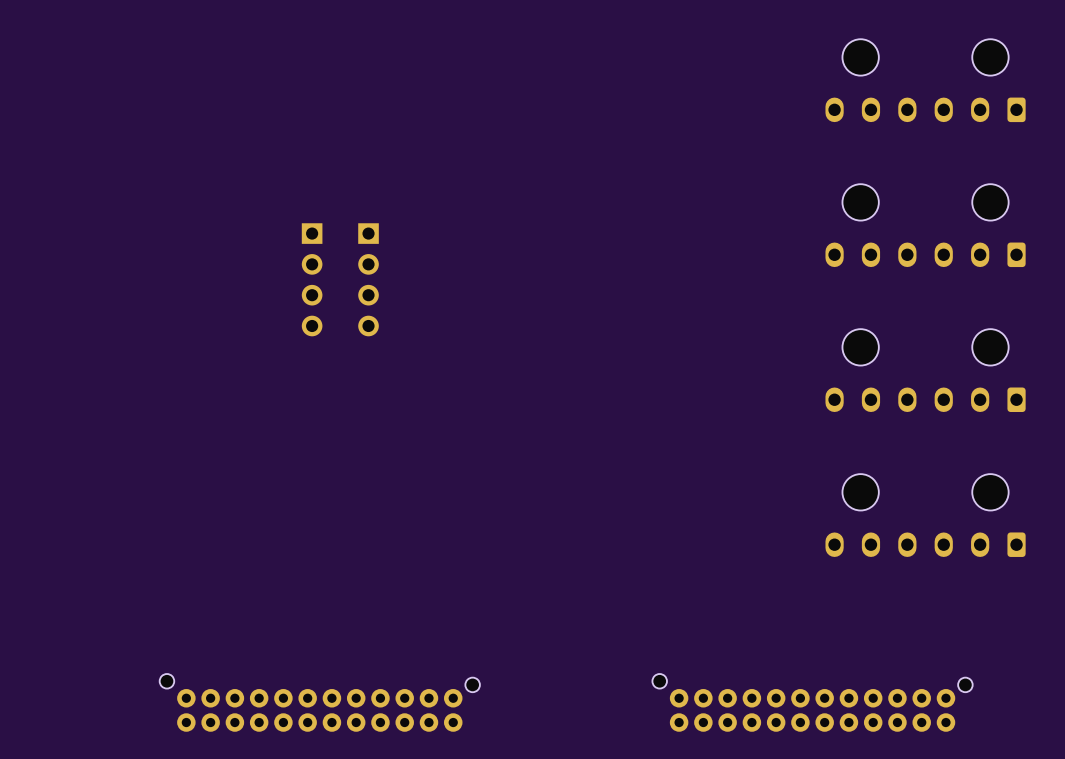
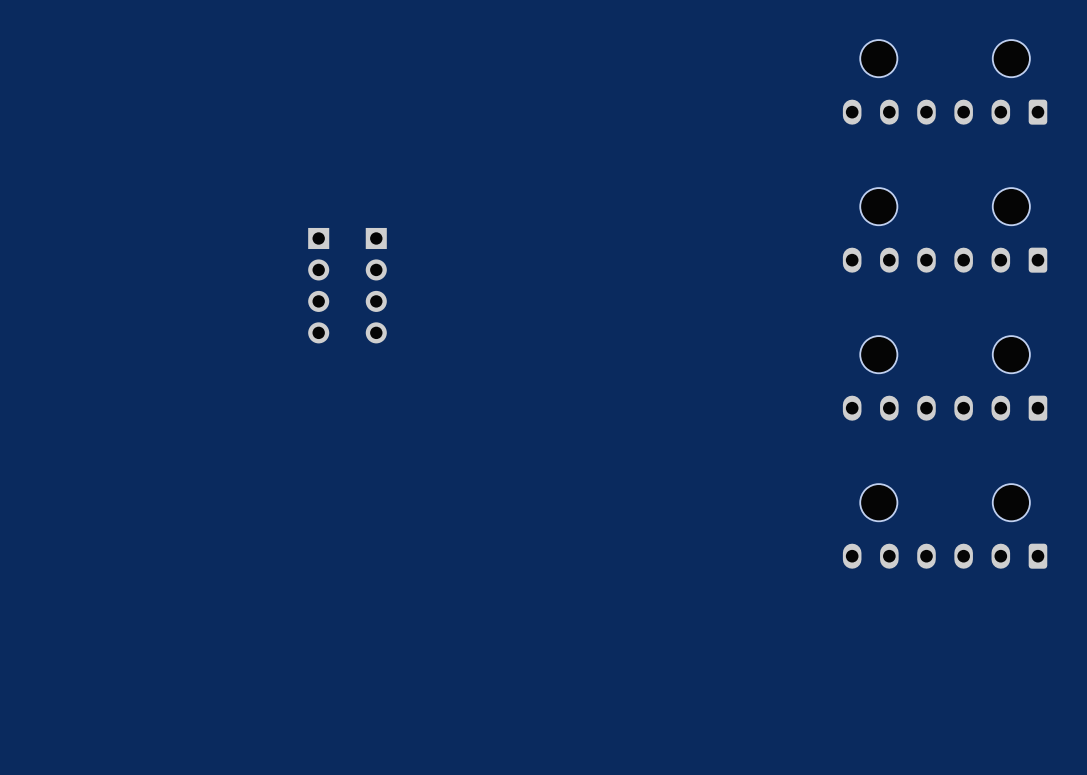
part: (319, 702) -> none
part: (812, 702) -> none

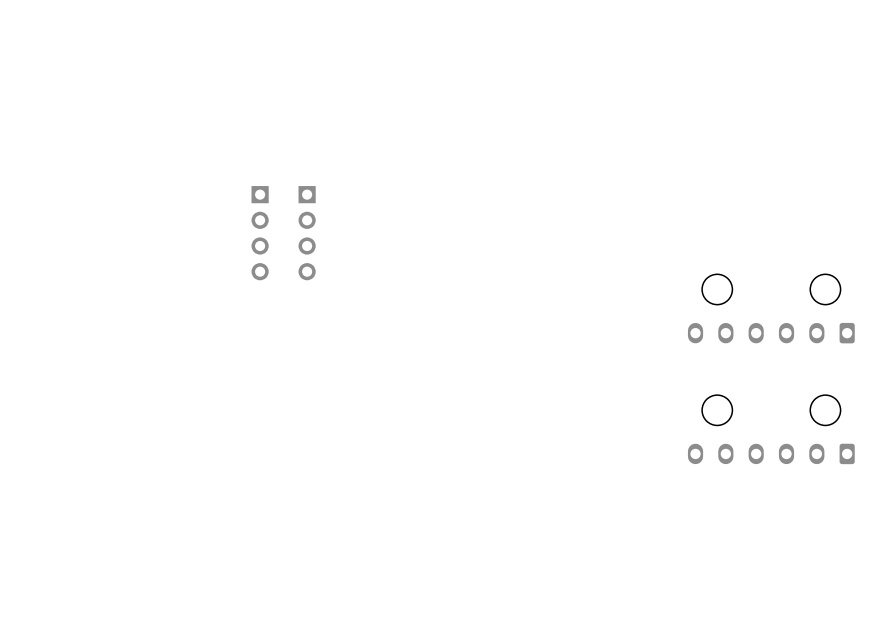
part: (945, 82) -> none
part: (945, 230) -> none

